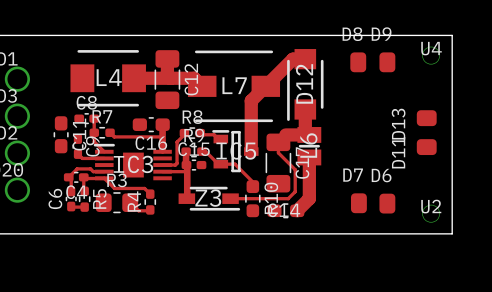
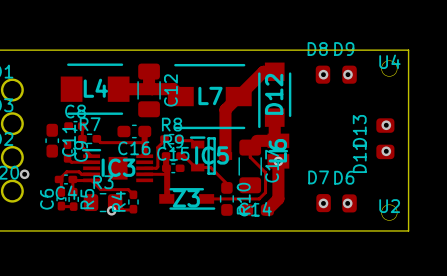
via: none -> (323, 74)
via: none -> (347, 74)
via: none -> (386, 125)
via: none -> (386, 151)
via: none -> (278, 161)
via: none -> (24, 174)
via: none -> (323, 203)
via: none -> (347, 203)
via: none -> (111, 210)

